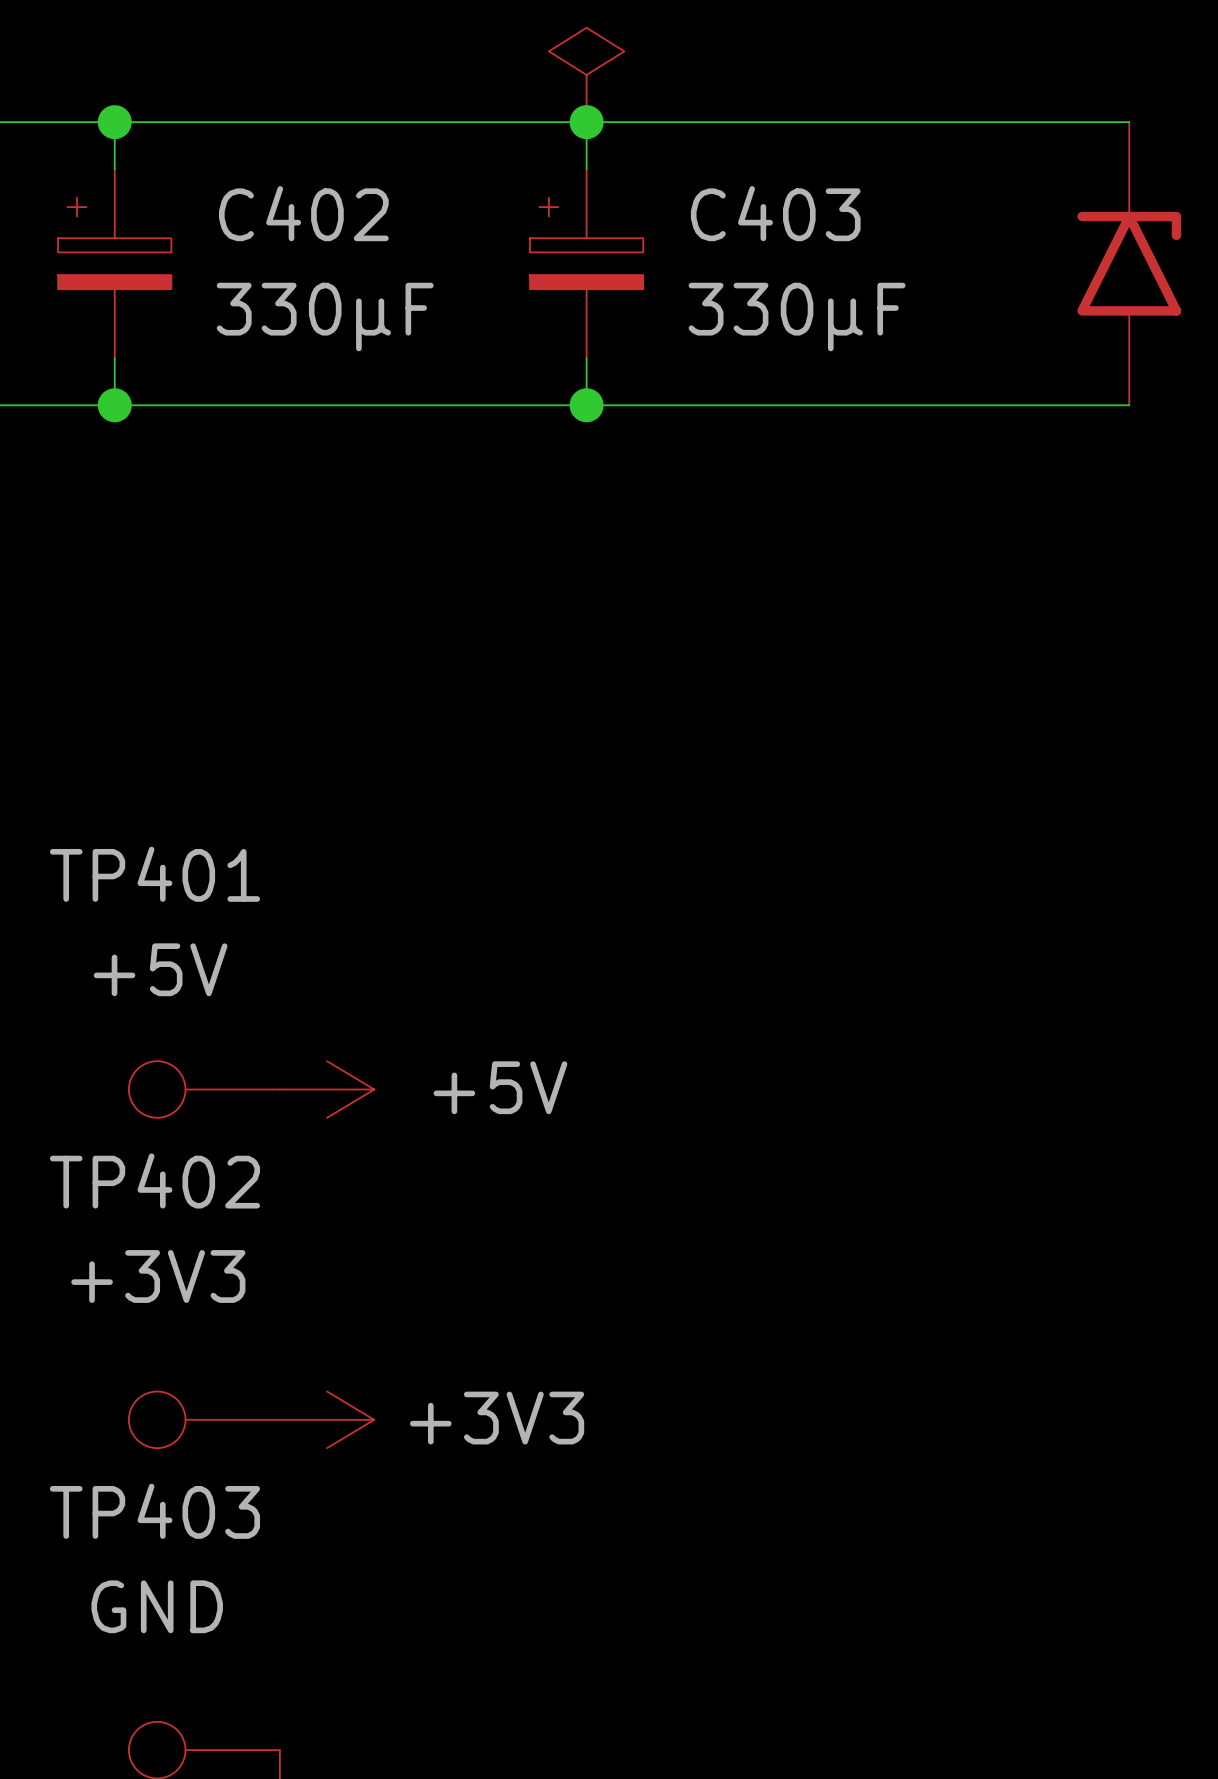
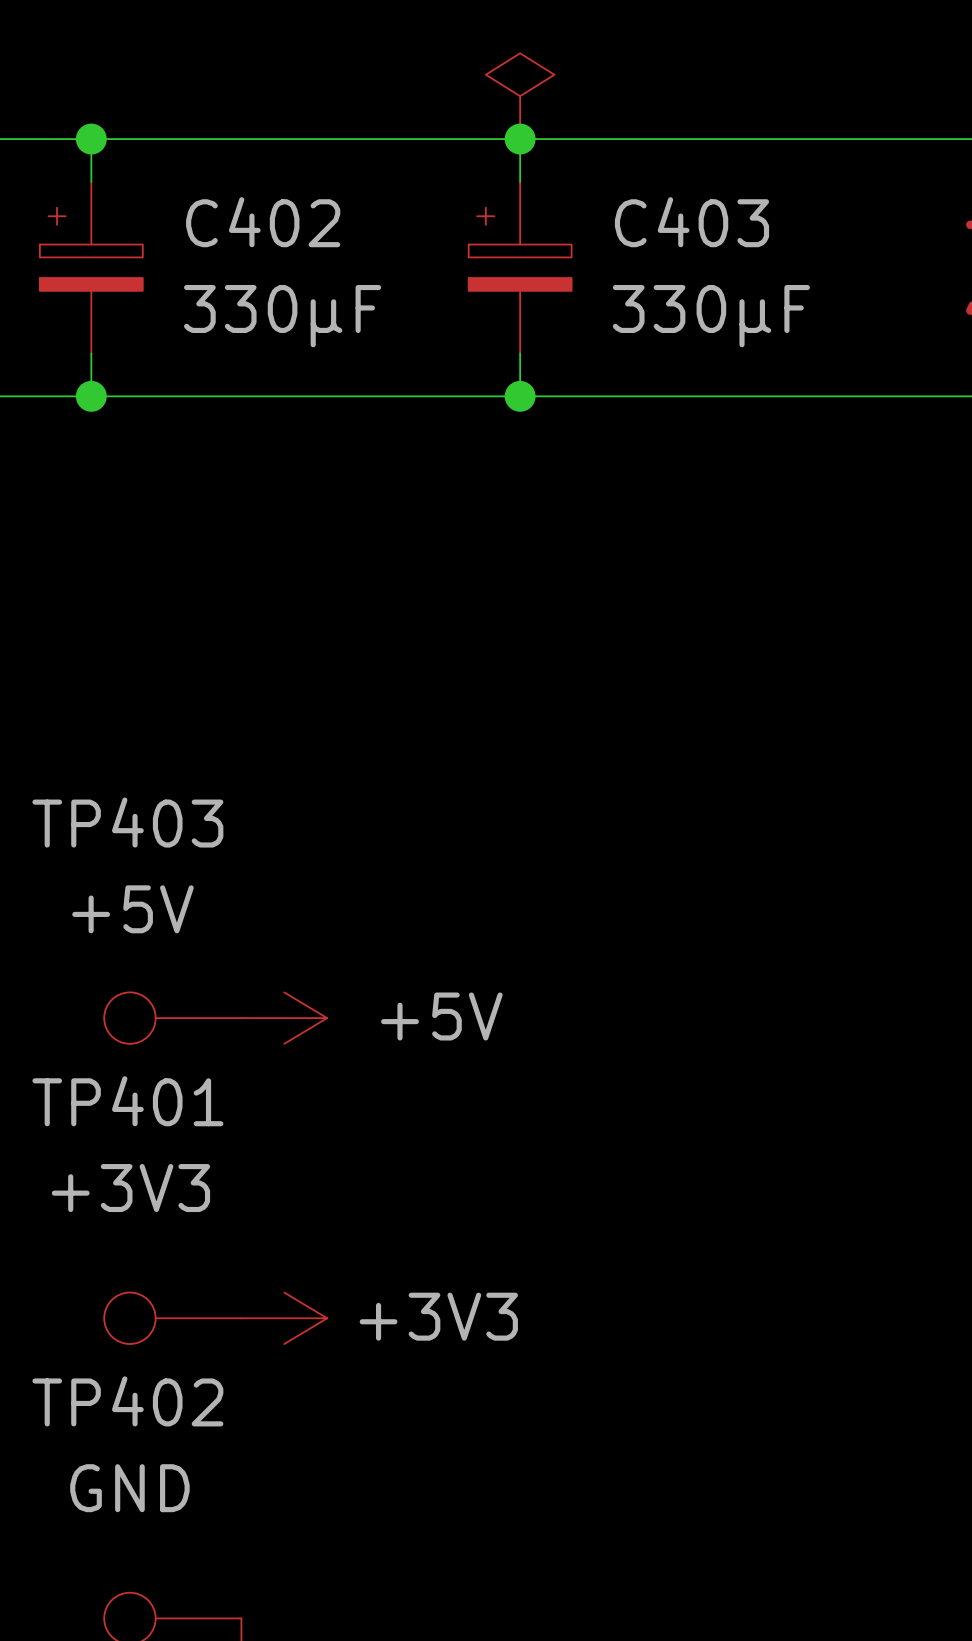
TP401 name: TP401 (154, 874) -> TP403 (127, 822)
TP402 name: TP402 (154, 1180) -> TP401 (127, 1101)
TP403 name: TP403 (154, 1511) -> TP402 (127, 1401)

